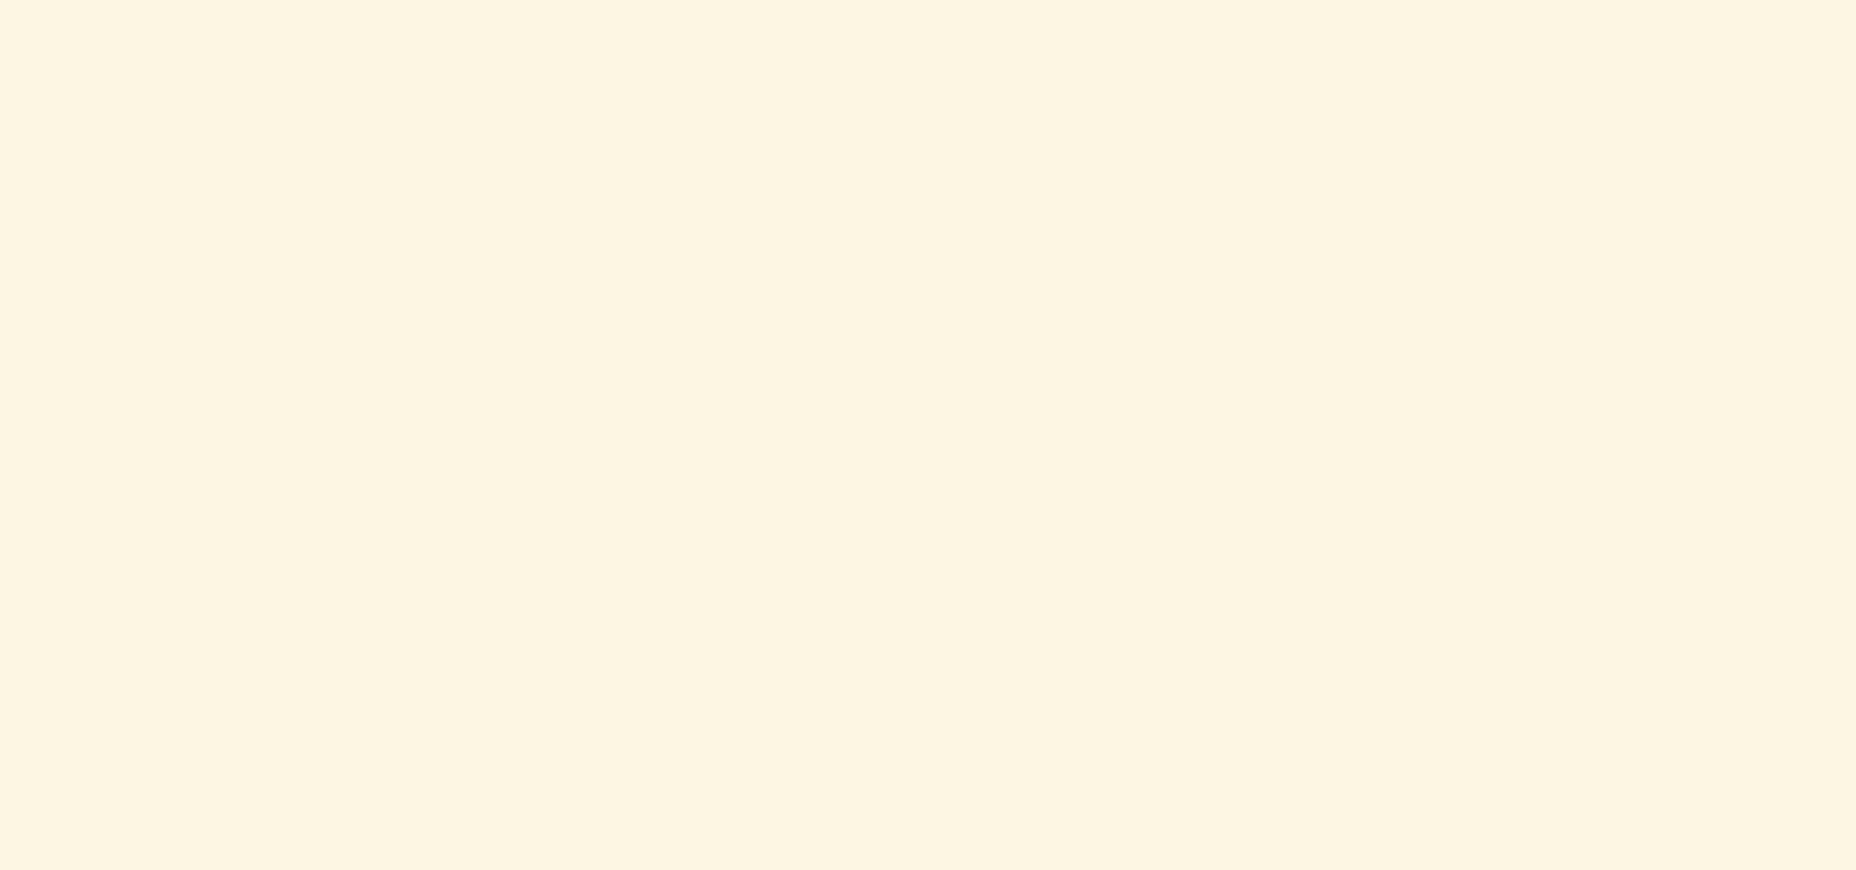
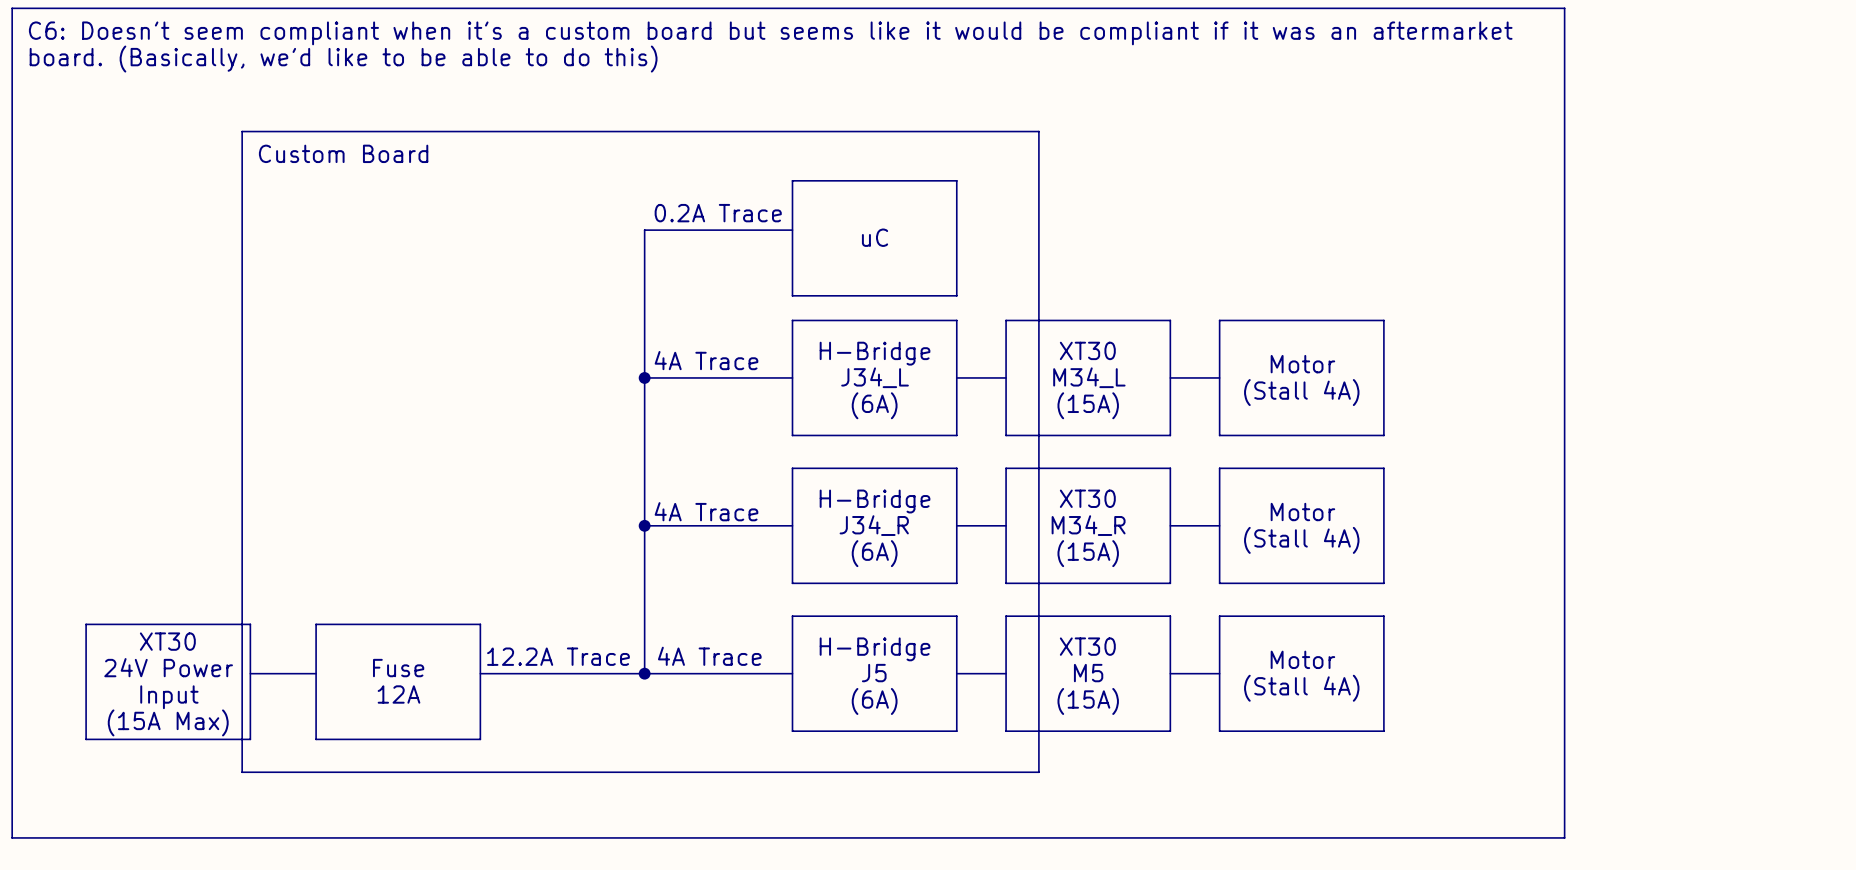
line: none -> (12, 8) (1564, 8) (1564, 837) (12, 837) (12, 8)
text: none -> C6: Doesn't seem compliant when it's a custom board but seems like it would be compliant if it was an aftermarket (770, 33)
text: none -> board. (Basically, we'd like to be able to do this) (343, 59)
line: none -> (242, 131) (1038, 131) (1038, 772) (242, 772) (242, 131)
text: none -> Custom Board (343, 153)
line: none -> (792, 180) (792, 295) (956, 295) (956, 180) (792, 180)
text: none -> 0.2A Trace (718, 213)
bus: none -> (792, 230) (644, 230) (644, 673)
text: none -> uC (875, 237)
line: none -> (792, 320) (792, 435) (956, 435) (956, 320) (792, 320)
line: none -> (1006, 320) (1006, 435) (1170, 435) (1170, 320) (1006, 320)
line: none -> (1219, 320) (1219, 435) (1383, 435) (1383, 320) (1219, 320)
text: none -> XT30 (1087, 350)
text: none -> H-Bridge (875, 353)
text: none -> 4A Trace (706, 360)
text: none -> Motor (1302, 364)
bus: none -> (644, 377) (792, 377)
junction: none -> (644, 377)
text: none -> J34_L (875, 377)
bus: none -> (956, 377) (1006, 377)
text: none -> M34_L (1089, 377)
bus: none -> (1170, 377) (1219, 377)
text: none -> (Stall 4A) (1301, 392)
text: none -> (6A) (874, 405)
text: none -> (15A) (1088, 405)
line: none -> (792, 468) (956, 468) (956, 583) (792, 583) (792, 468)
line: none -> (1006, 468) (1006, 583) (1170, 583) (1170, 468) (1006, 468)
line: none -> (1219, 468) (1219, 583) (1383, 583) (1383, 468) (1219, 468)
text: none -> XT30 (1087, 498)
text: none -> H-Bridge (875, 501)
text: none -> 4A Trace (706, 511)
text: none -> Motor (1302, 511)
bus: none -> (644, 525) (792, 525)
junction: none -> (644, 525)
text: none -> J34_R (874, 525)
bus: none -> (956, 525) (1006, 525)
text: none -> M34_R (1088, 525)
bus: none -> (1170, 525) (1219, 525)
text: none -> (Stall 4A) (1301, 540)
text: none -> (6A) (874, 553)
text: none -> (15A) (1088, 553)
line: none -> (792, 616) (956, 616) (956, 731) (792, 731) (792, 616)
line: none -> (1006, 616) (1170, 616) (1170, 731) (1006, 731) (1006, 616)
line: none -> (1219, 616) (1383, 616) (1383, 731) (1219, 731) (1219, 616)
line: none -> (86, 624) (250, 624) (250, 739) (86, 739) (86, 624)
line: none -> (316, 624) (480, 624) (480, 739) (316, 739) (316, 624)
text: none -> XT30 (167, 641)
text: none -> XT30 (1087, 646)
text: none -> H-Bridge (875, 649)
text: none -> 12.2A Trace (558, 656)
text: none -> 4A Trace (709, 656)
text: none -> Motor (1302, 659)
text: none -> 24V Power (168, 667)
text: none -> Fuse (398, 668)
bus: none -> (250, 673) (316, 673)
bus: none -> (480, 673) (792, 673)
junction: none -> (644, 673)
text: none -> J5 (874, 673)
bus: none -> (956, 673) (1006, 673)
text: none -> M5 (1088, 673)
bus: none -> (1170, 673) (1219, 673)
text: none -> (Stall 4A) (1301, 688)
text: none -> 12A (399, 694)
text: none -> Input (169, 697)
text: none -> (6A) (874, 701)
text: none -> (15A) (1088, 701)
text: none -> (15A Max) (168, 722)

